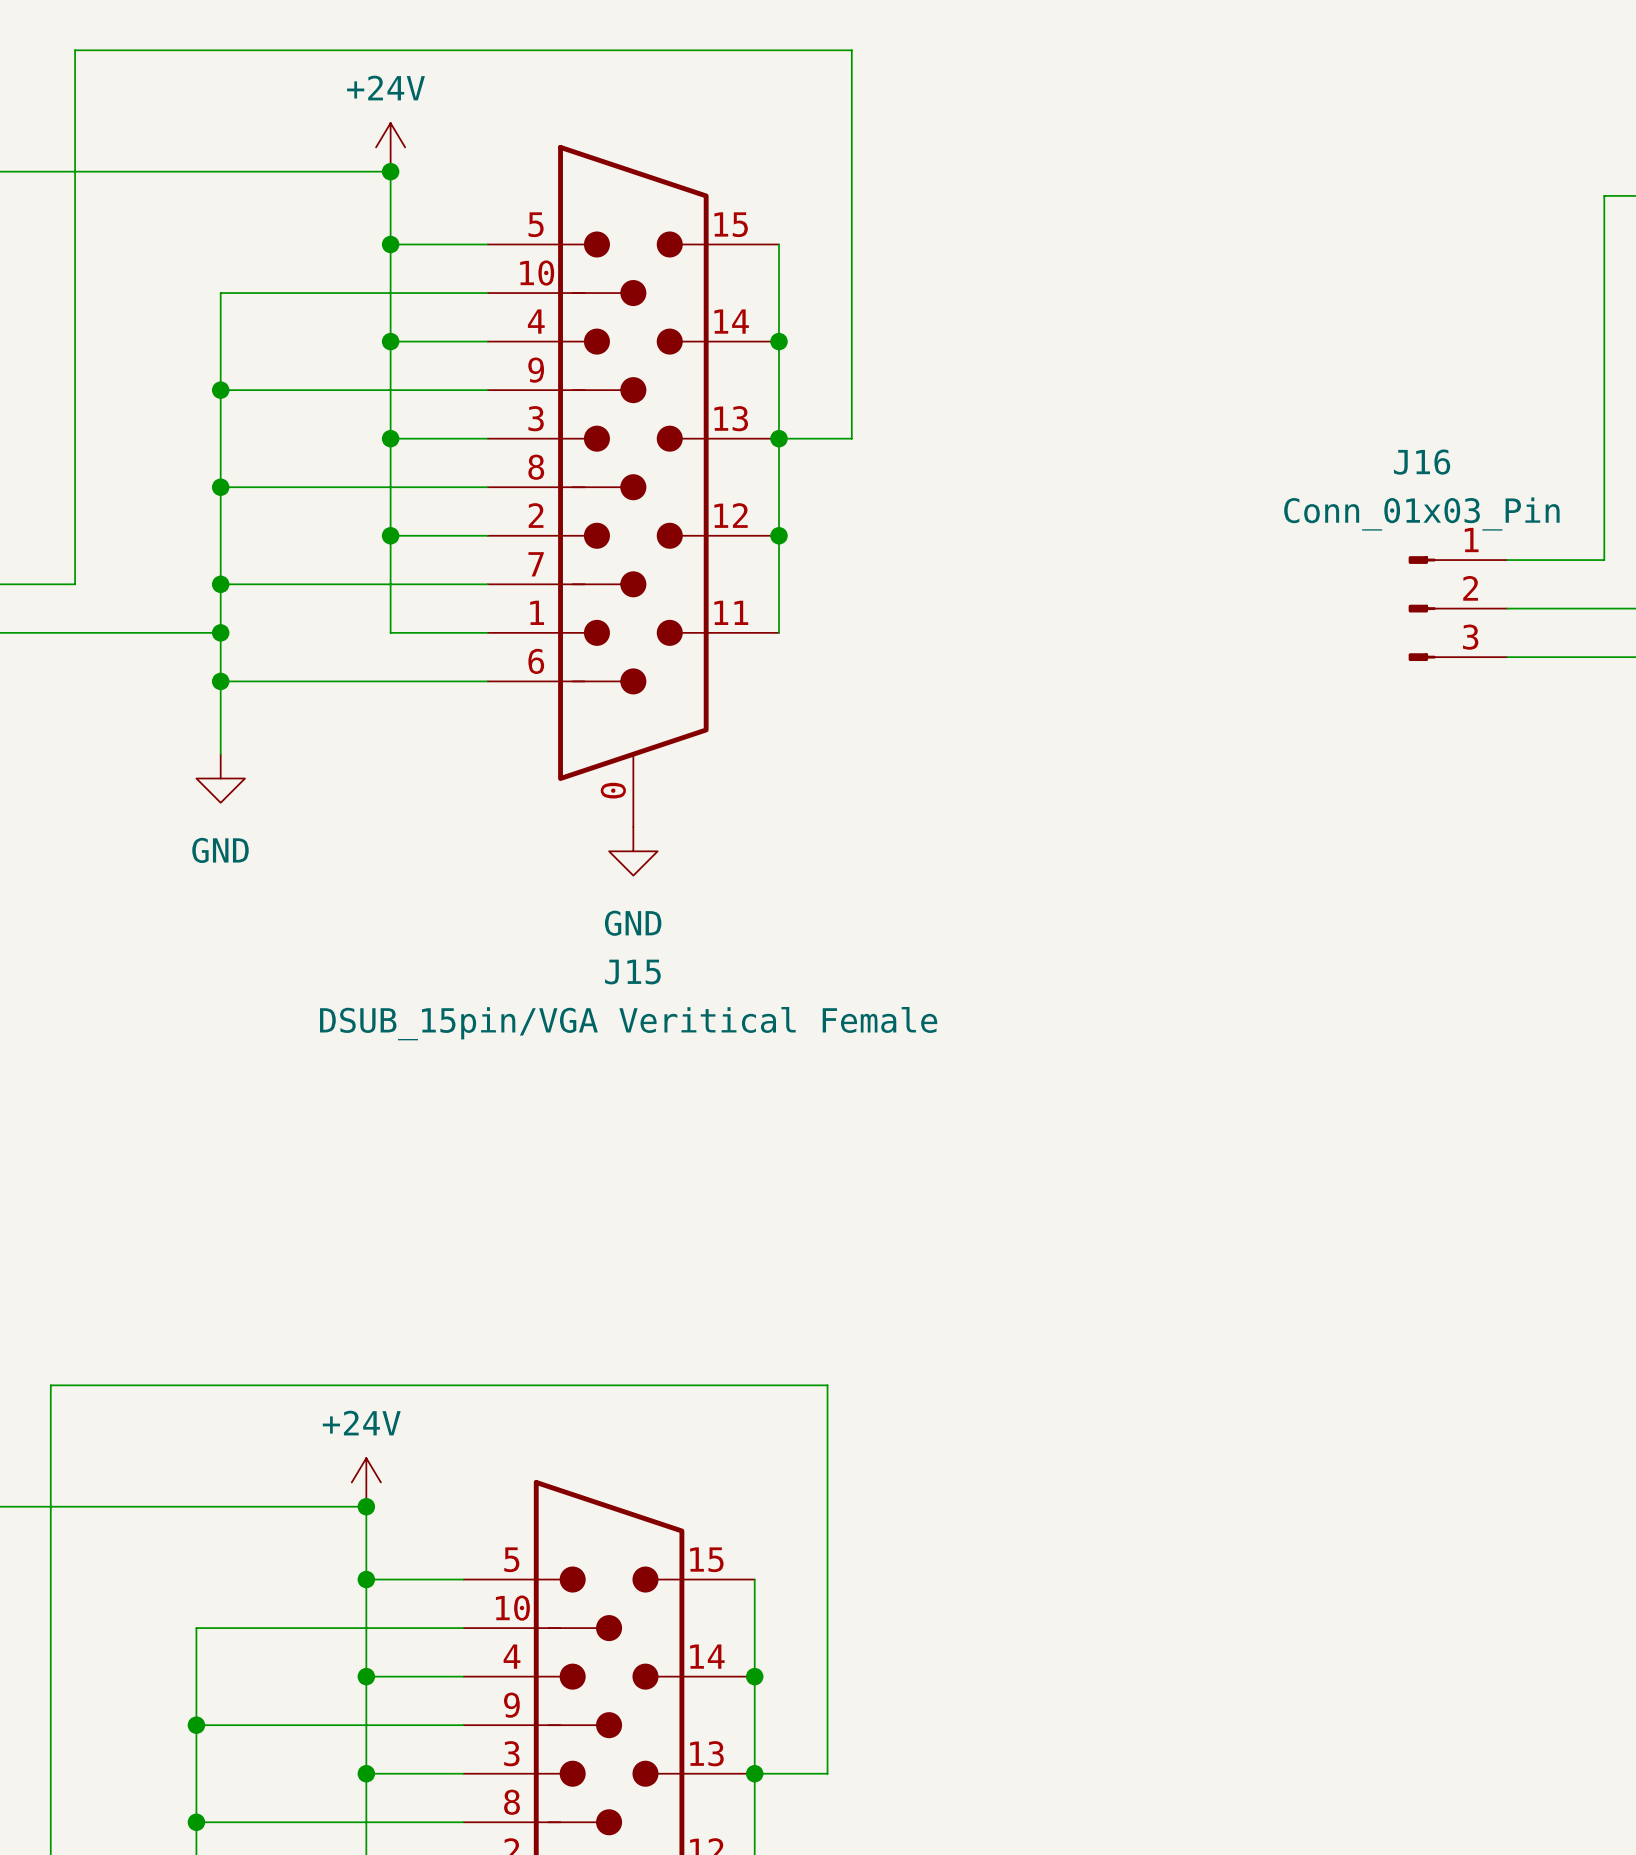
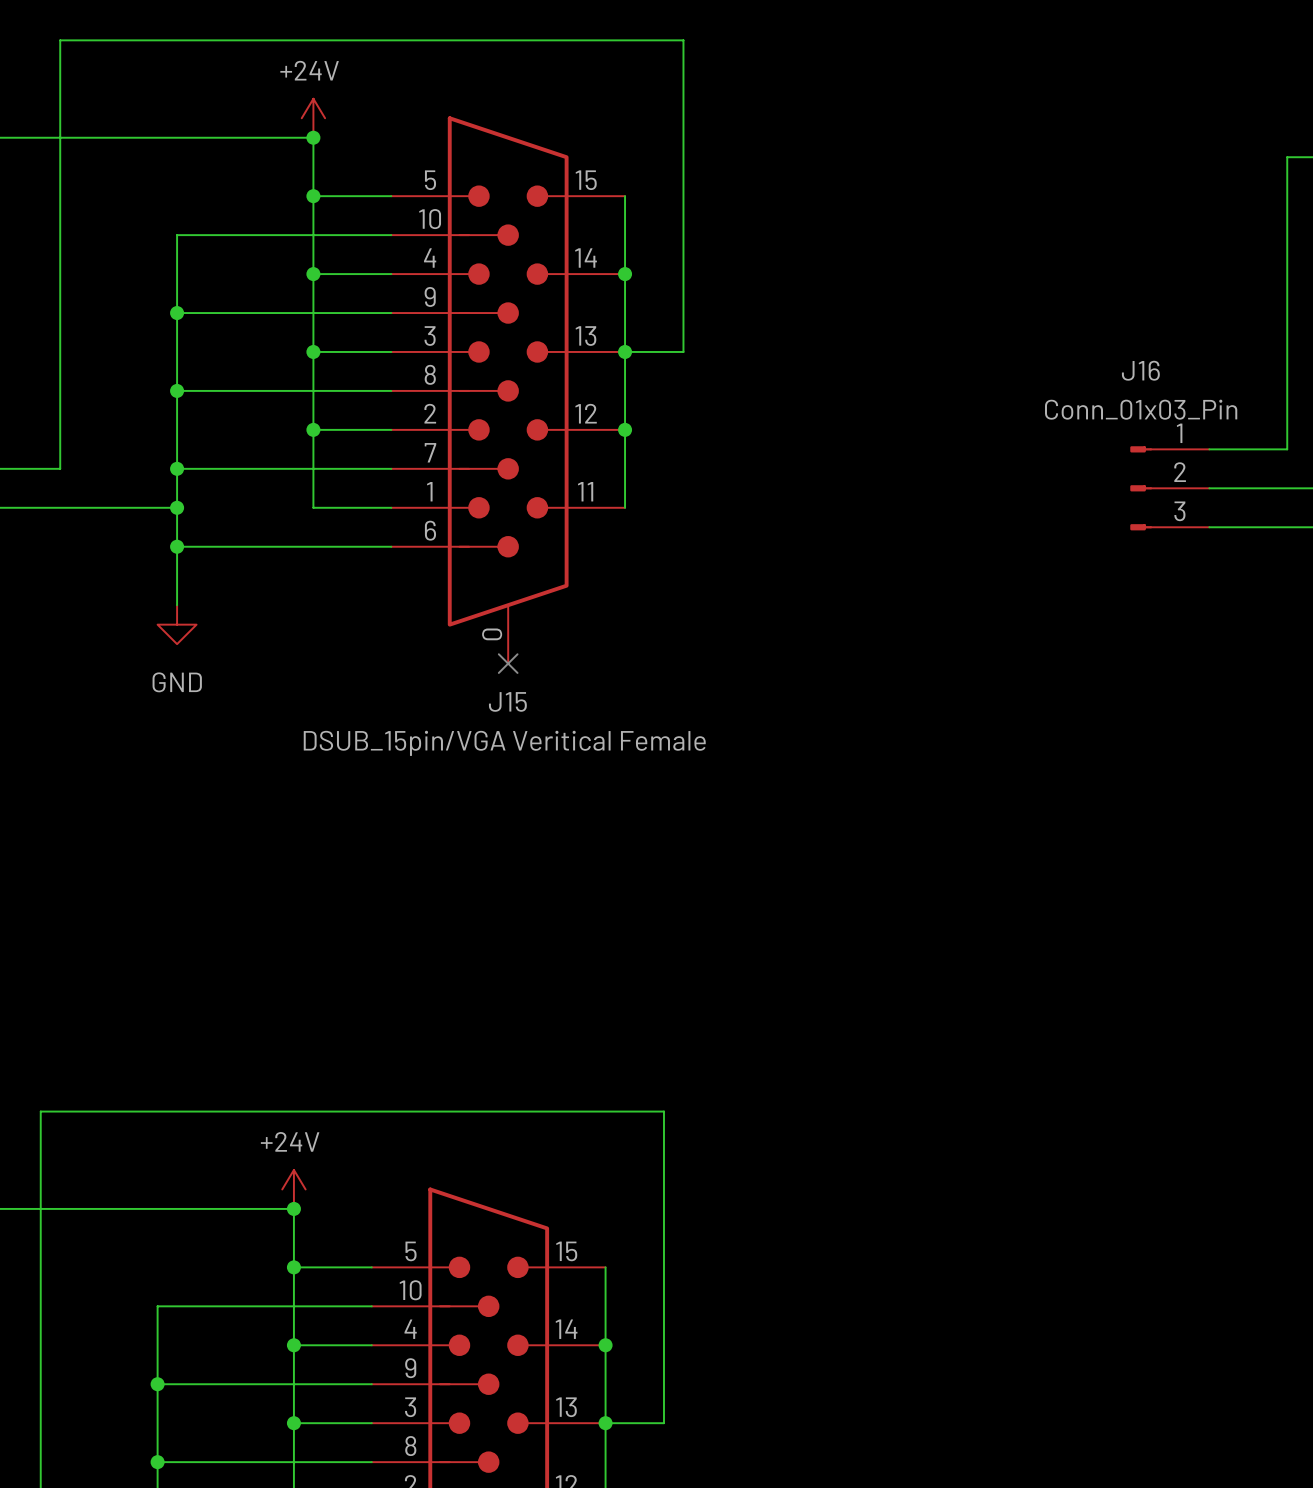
no-connect mark: none -> (508, 663)
power symbol: GND (633, 851) -> none
J15 name position: J15 (632, 972) -> J15 (507, 701)
J15 value position: DSUB_15pin/VGA Veritical Female (628, 1023) -> DSUB_15pin/VGA Veritical Female (504, 743)

